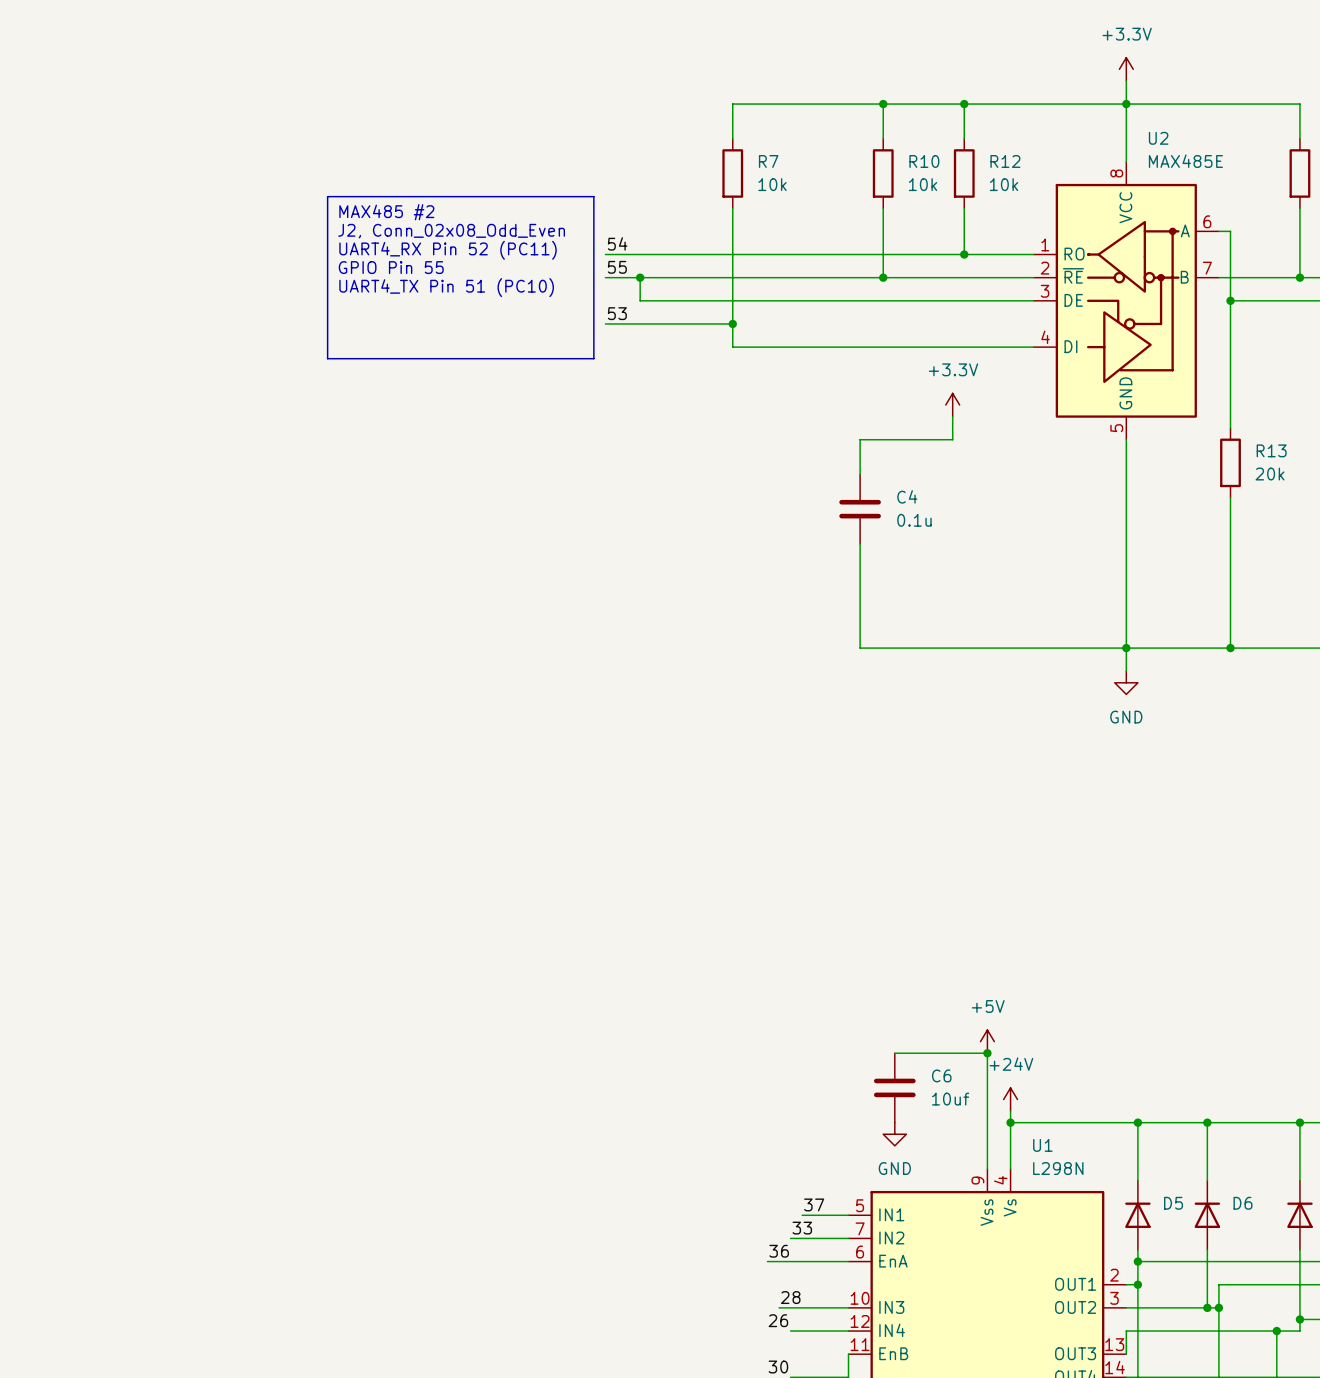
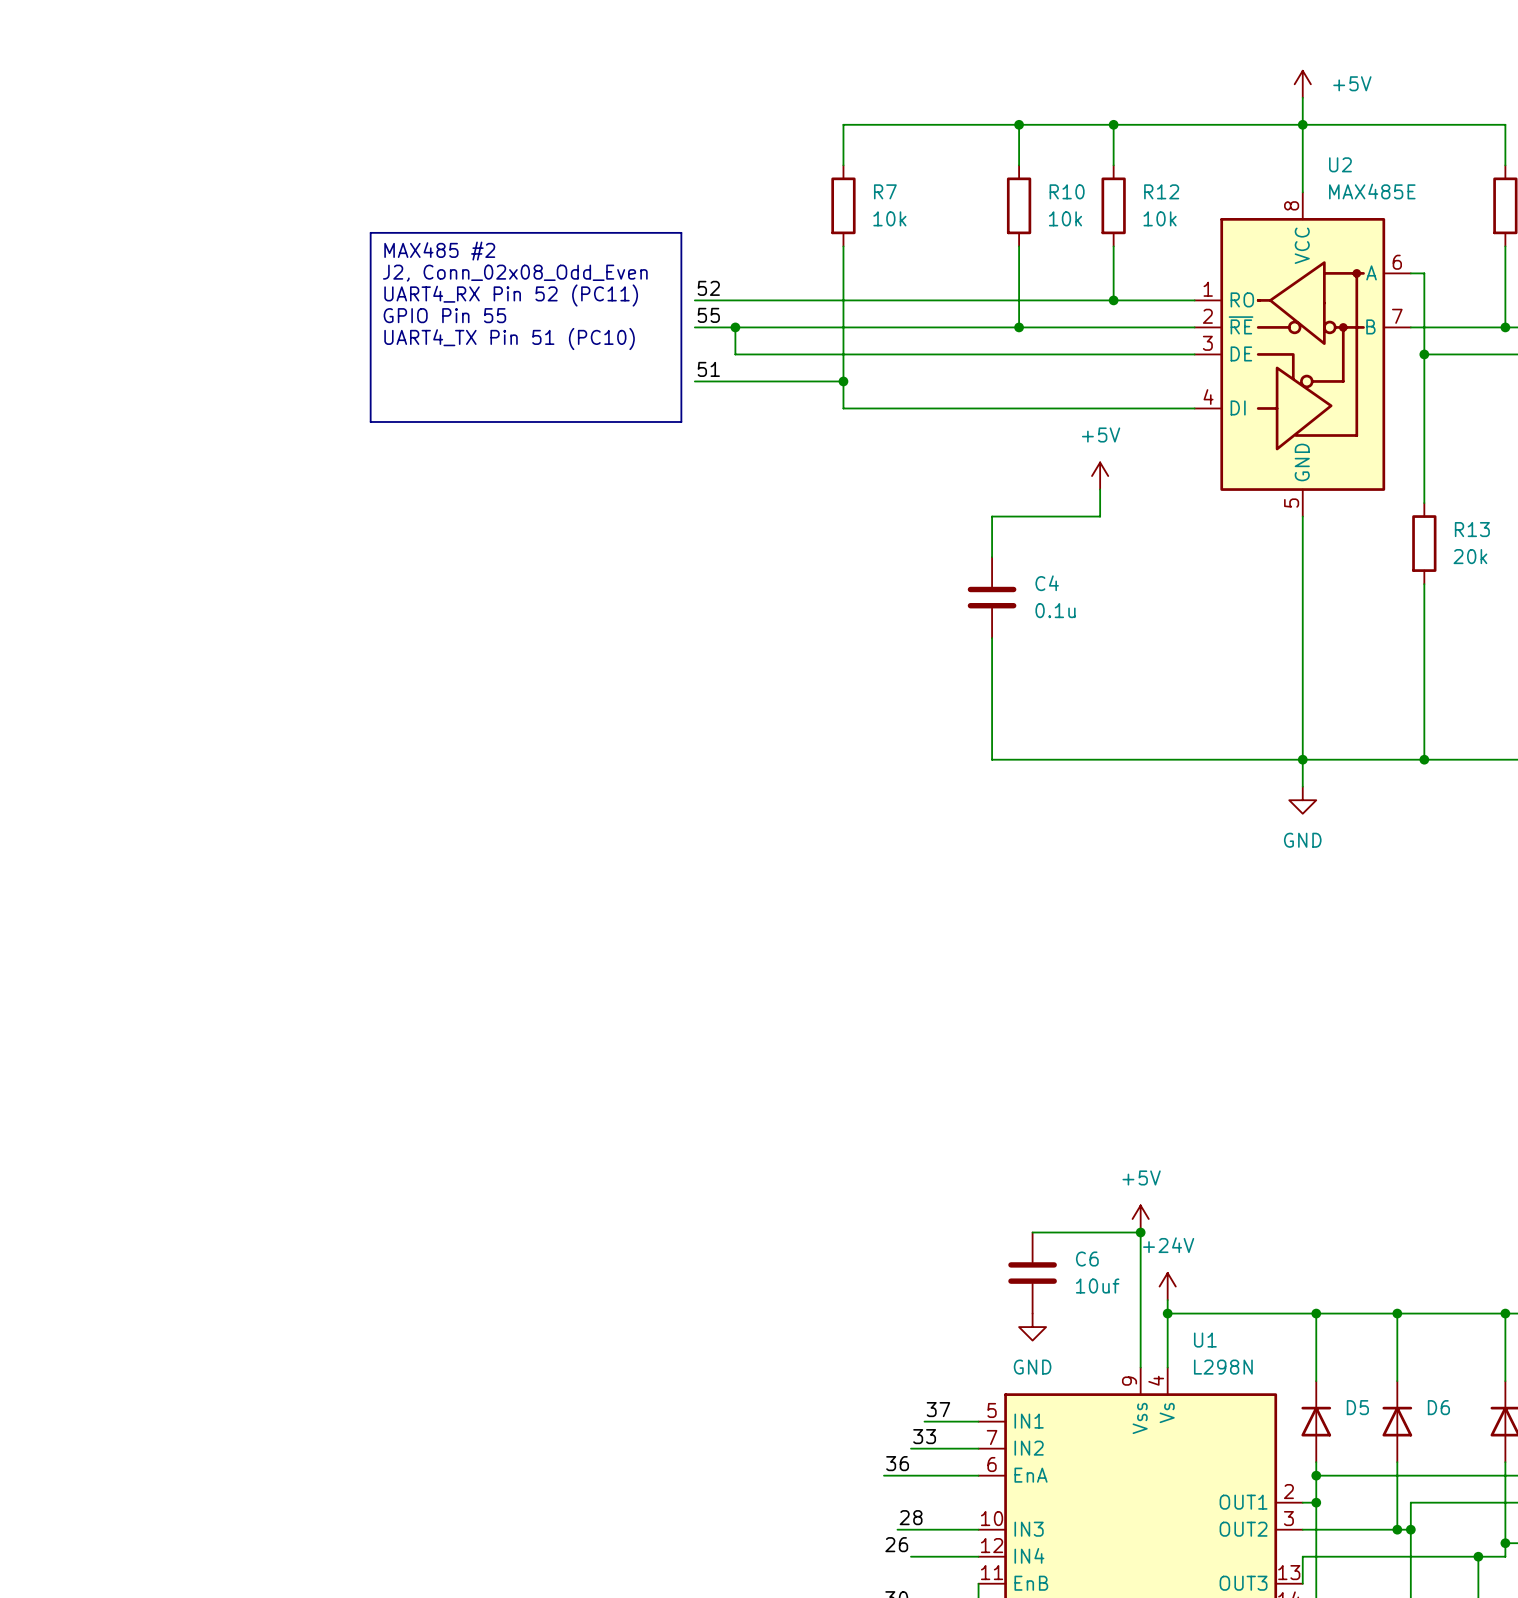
power symbol: +3.3V (1126, 69) -> +5V (1302, 84)
label: 54 (617, 243) -> 52 (708, 288)
label: 53 (617, 313) -> 51 (708, 369)
power symbol: +3.3V (952, 404) -> +5V (1100, 476)

